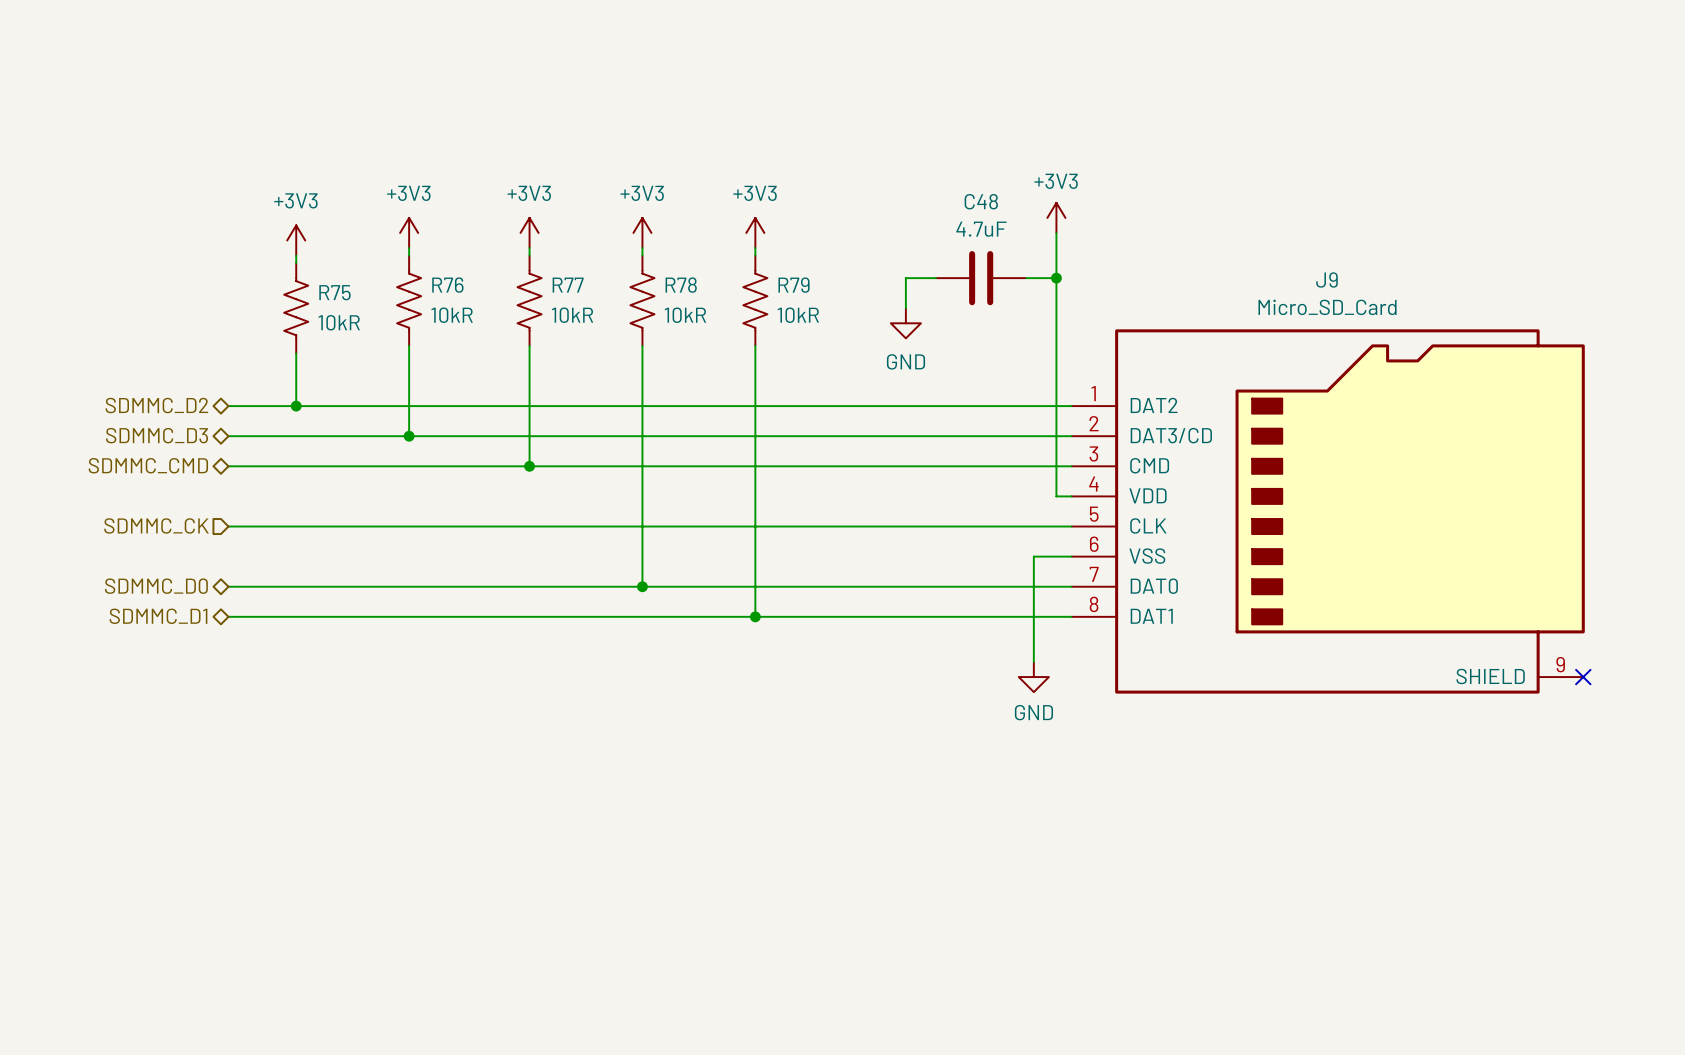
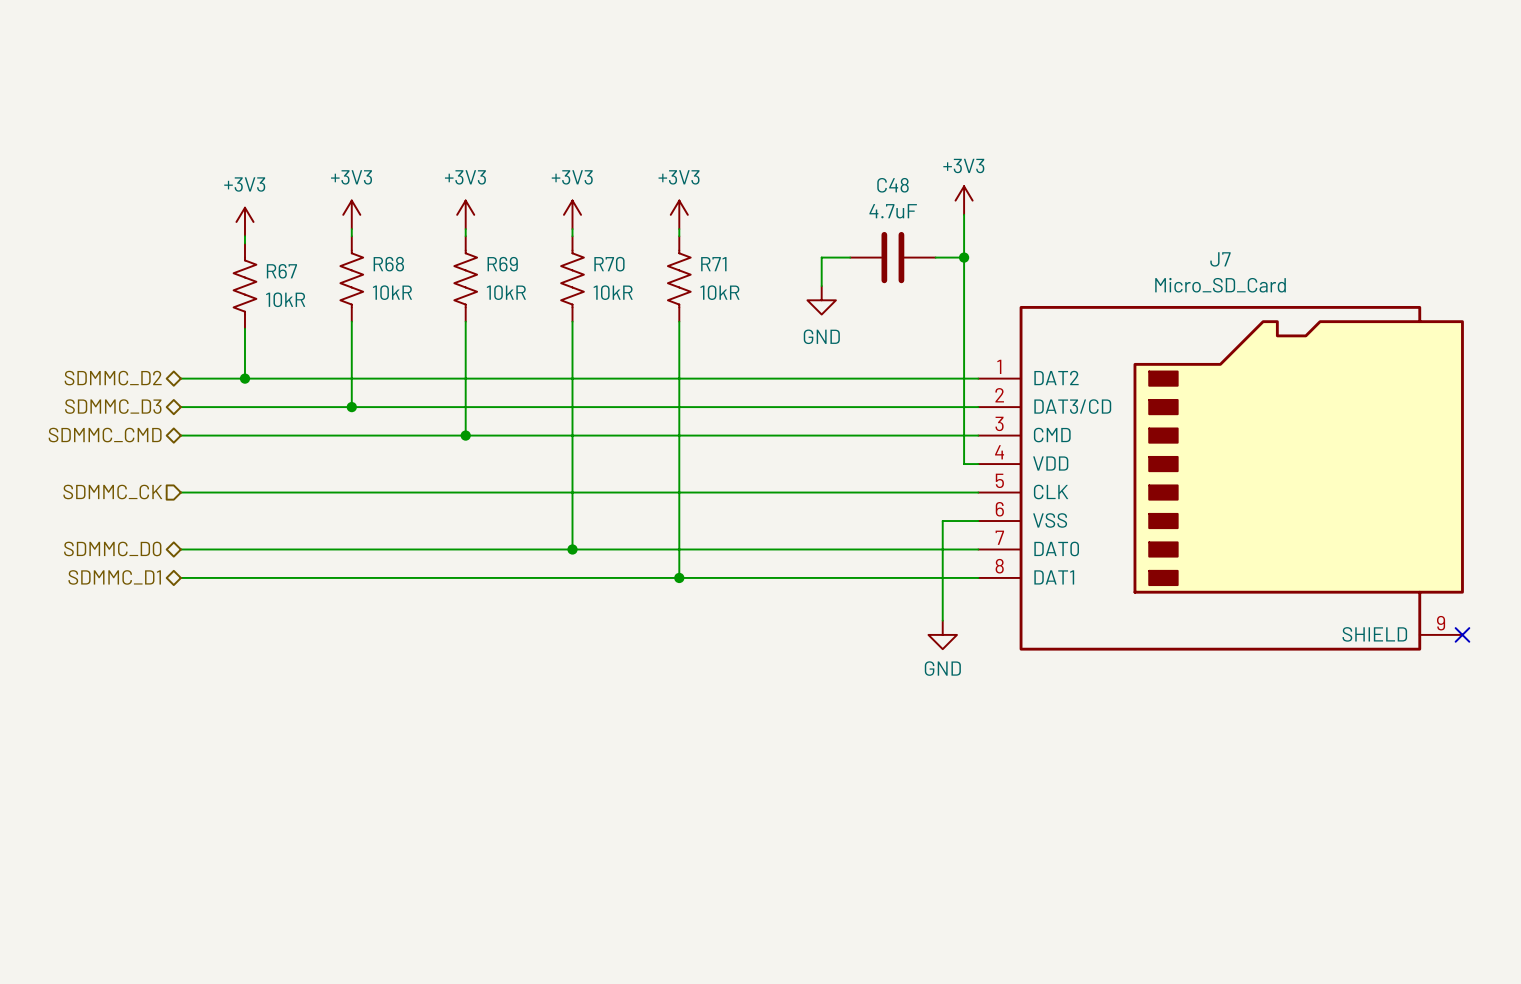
J9 name: J9 (1327, 279) -> J7 (1220, 259)
R76 name: R76 (447, 285) -> R68 (388, 264)
R77 name: R77 (568, 285) -> R69 (502, 264)
R78 name: R78 (681, 285) -> R70 (609, 264)
R79 name: R79 (794, 285) -> R71 (713, 264)
R75 name: R75 (334, 292) -> R67 (281, 271)

